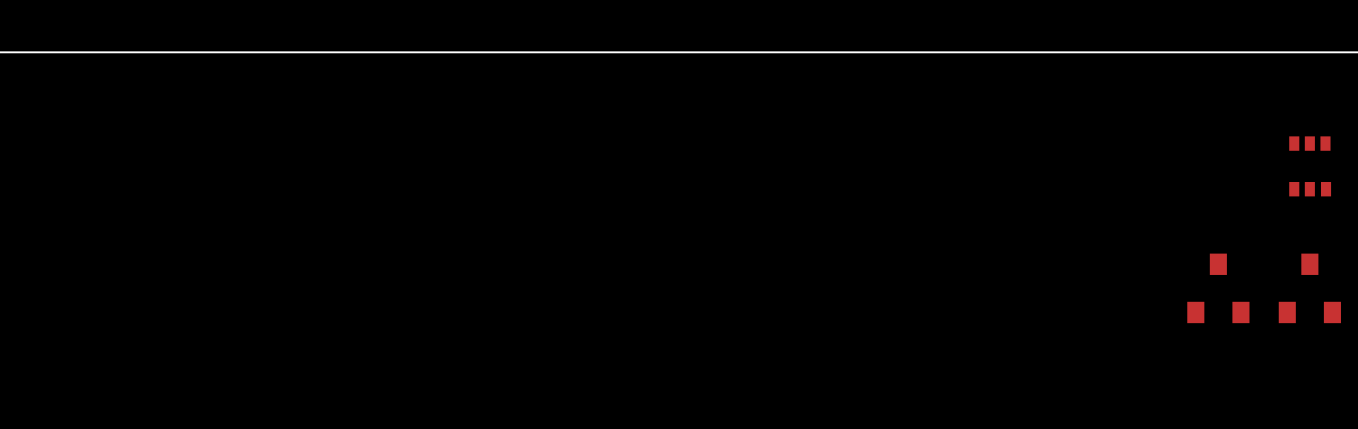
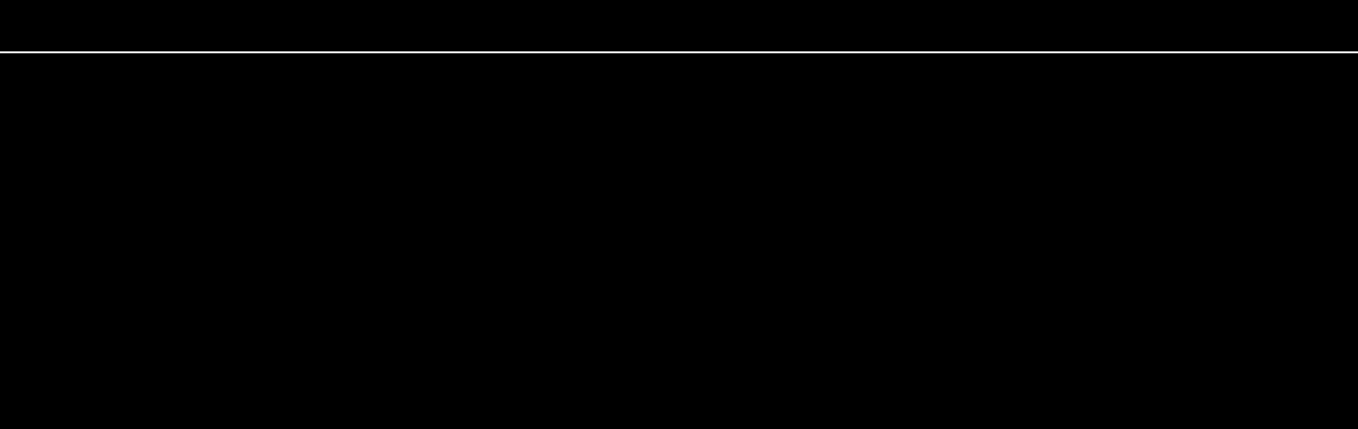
part: (1310, 166) -> none
part: (1218, 288) -> none
part: (1309, 288) -> none

